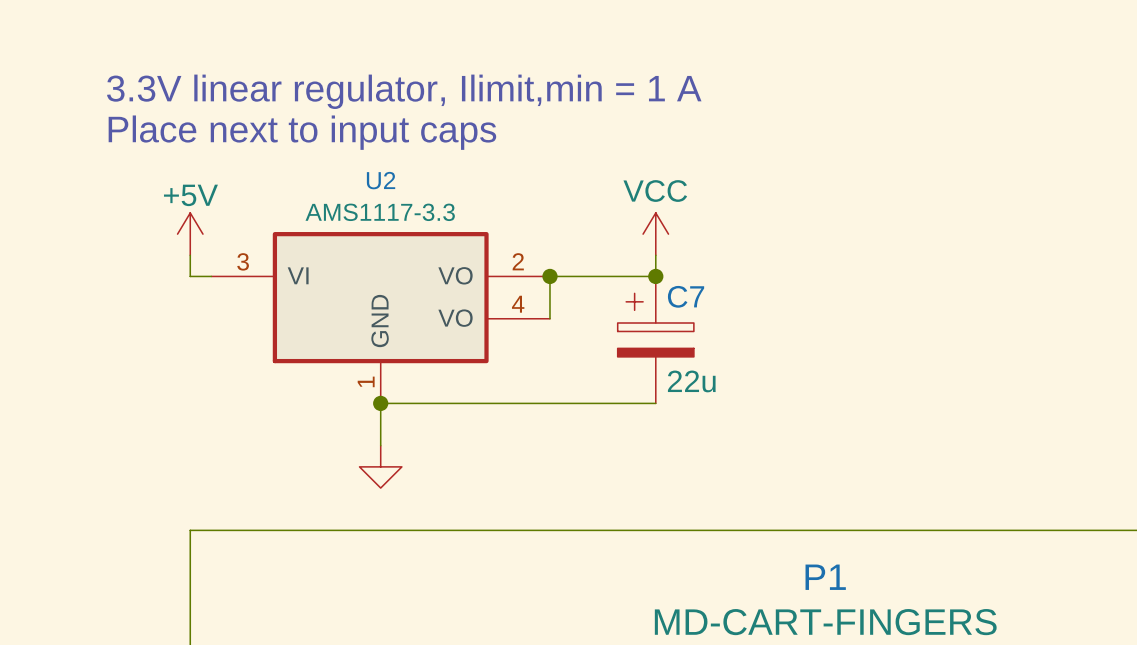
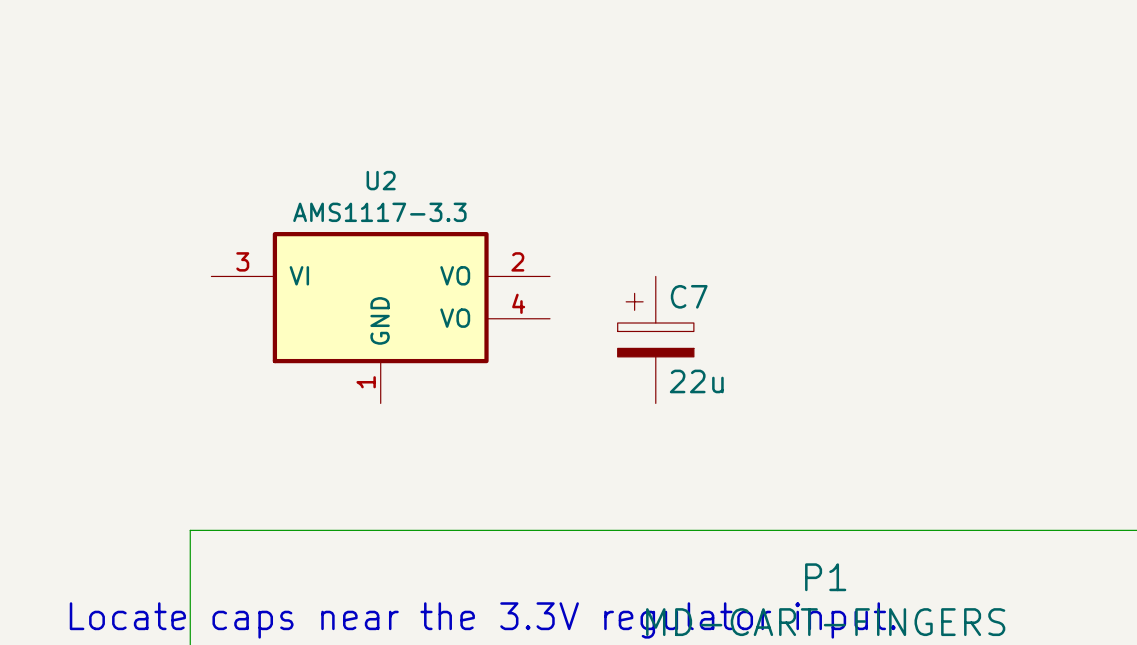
text: 3.3V linear regulator, Ilimit,min = 1 A (404, 91) -> none
text: Place next to input caps (302, 132) -> none
power symbol: +5V (190, 234) -> none
power symbol: VCC (655, 234) -> none
wire: (190, 255) (190, 276) (211, 276) -> none
wire: (655, 255) (655, 276) (549, 276) (549, 318) -> none
junction: (549, 276) -> none
junction: (655, 276) -> none
junction: (380, 403) -> none
wire: (655, 403) (380, 403) (380, 445) -> none
power symbol: (380, 466) -> none
text: none -> Locate caps near the 3.3V regulator input. (482, 620)

